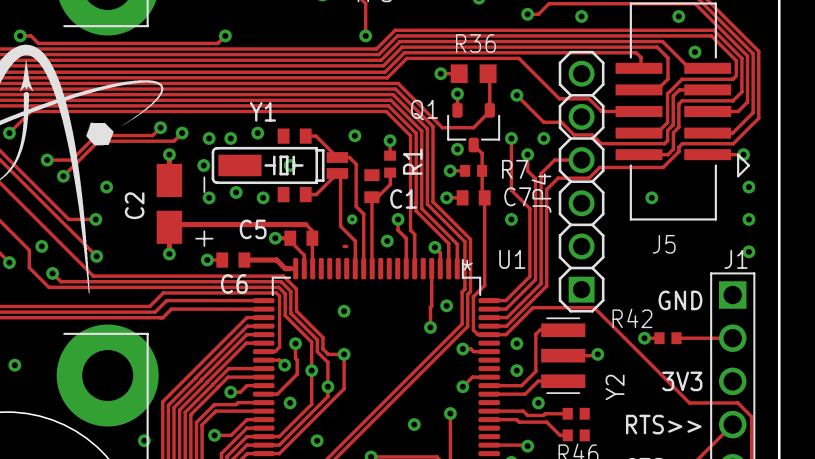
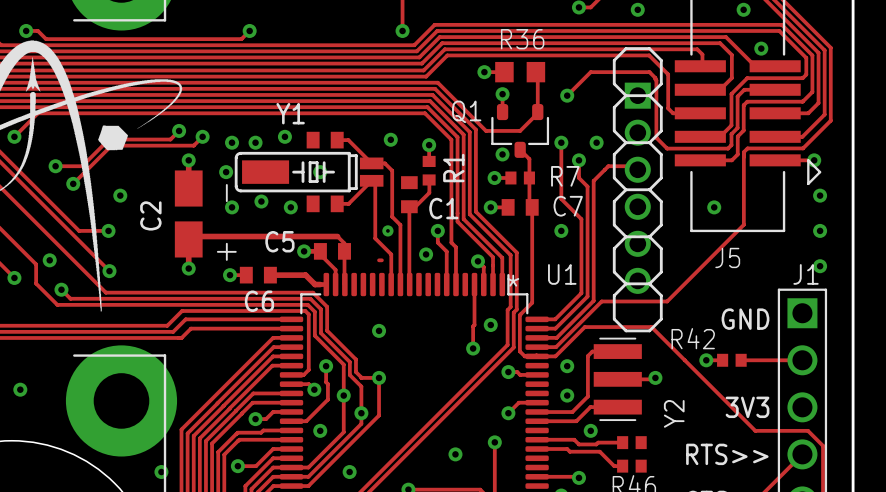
track: (518, 58) (559, 98) (589, 98) (601, 111) (613, 111) -> (569, 55) (649, 55) (668, 74) (668, 108) (673, 113)
track: (516, 95) (543, 122) (561, 122) (574, 134) (592, 134) (601, 143) (664, 143) -> (567, 95) (590, 72) (649, 72) (656, 80) (656, 137) (667, 148) (728, 148)
track: (678, 151) (663, 167) (599, 167) (589, 178) (558, 178) (546, 189) (546, 286) -> (743, 157) (743, 224) (667, 301) (601, 301) (599, 303)
part: none -> (637, 188)
JP4: (581, 181) -> none

